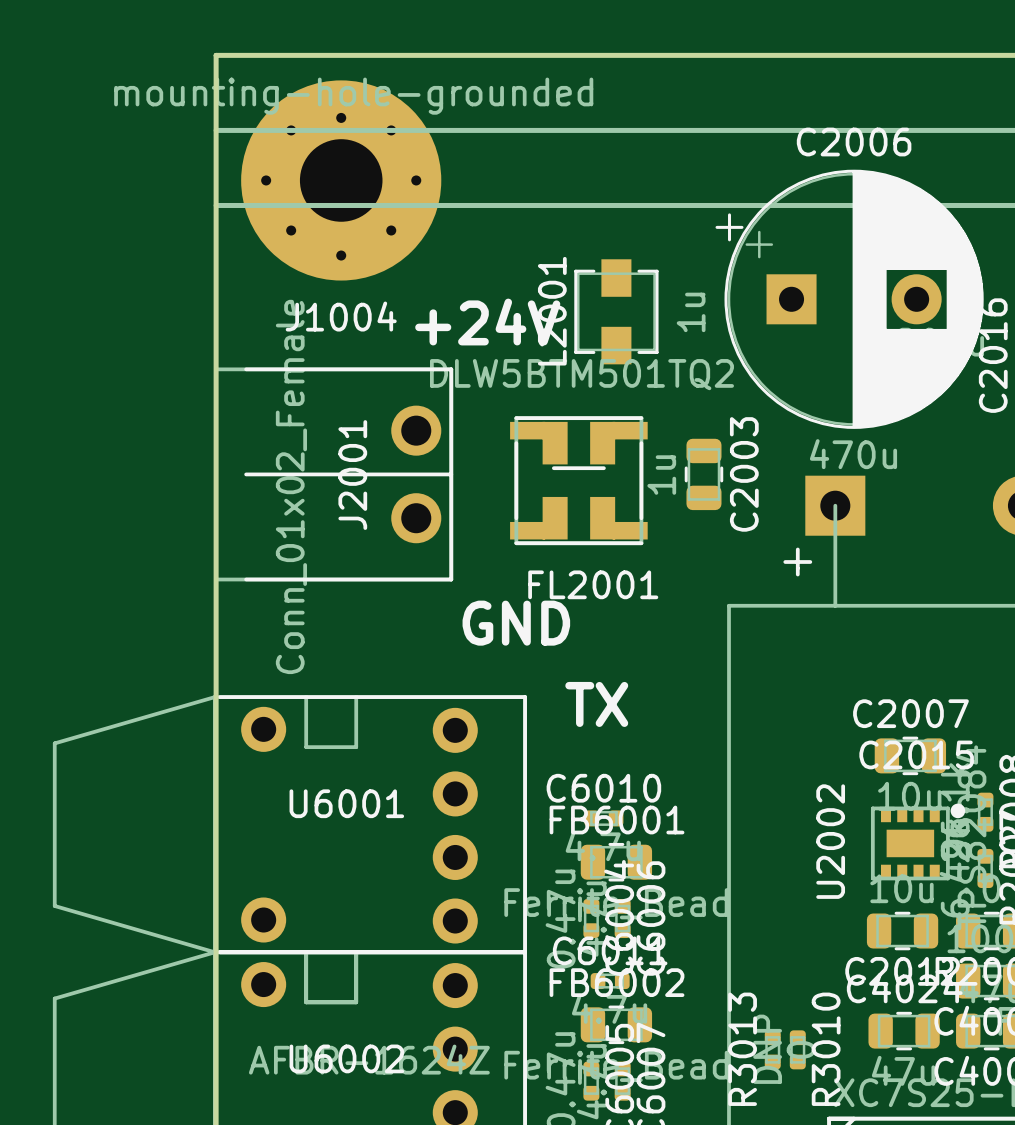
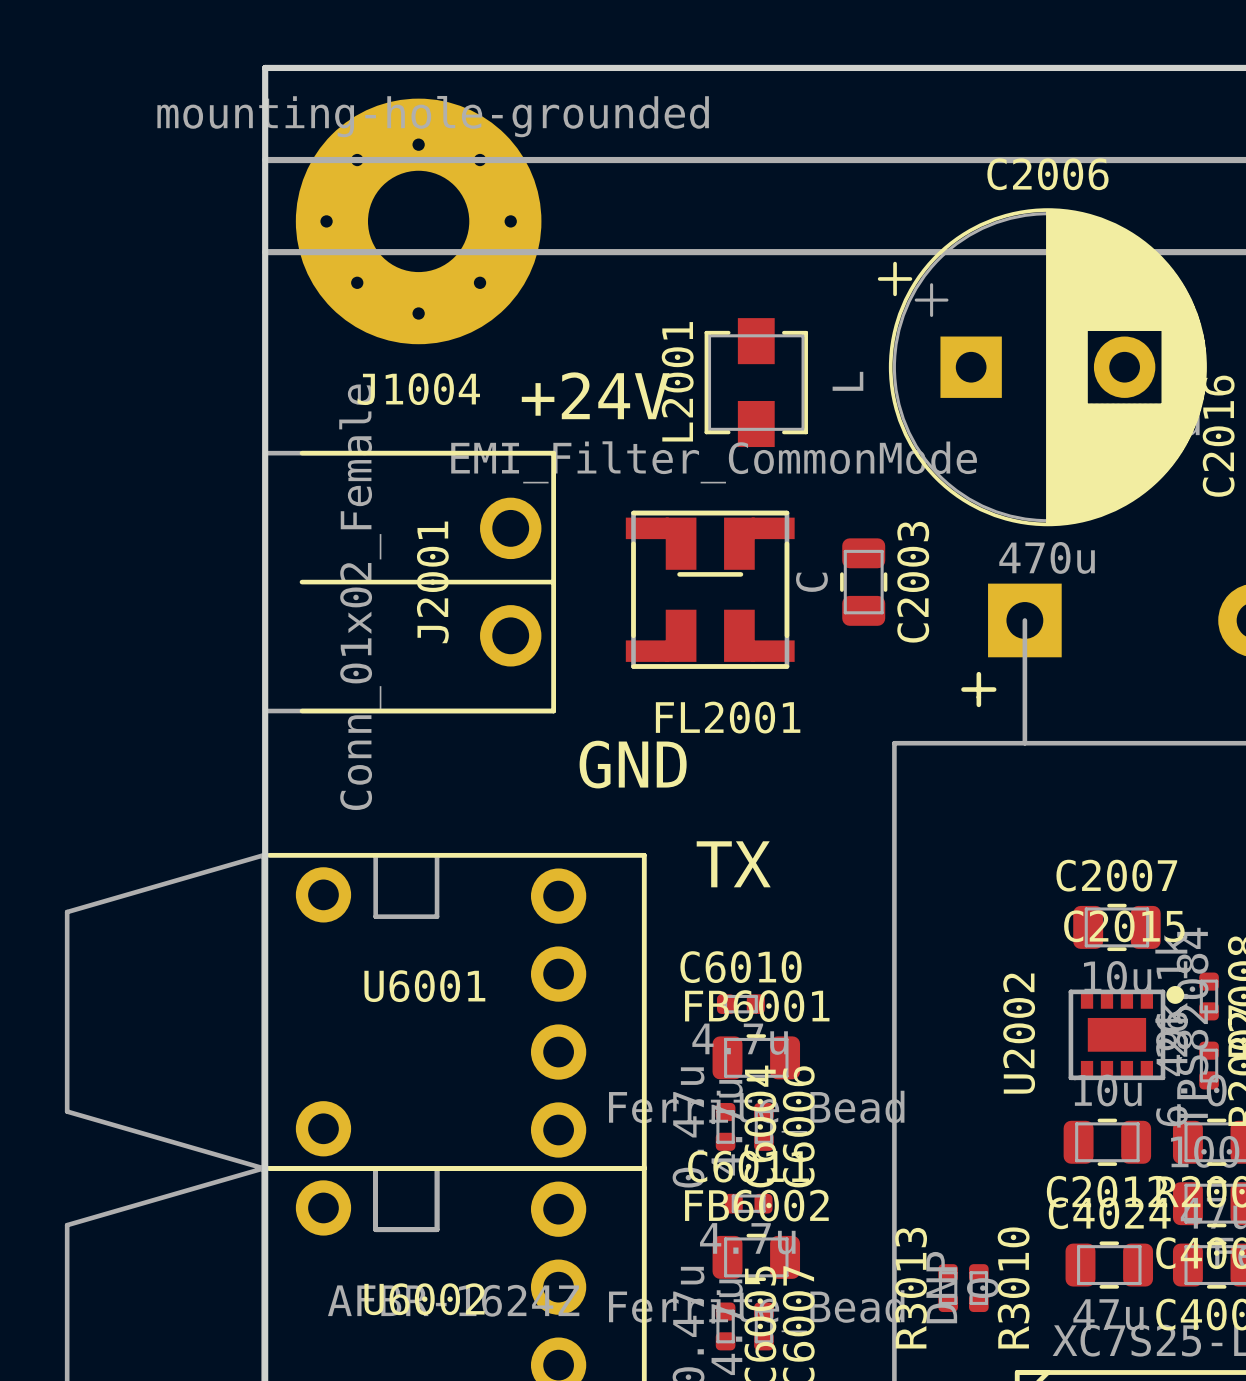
L2001 value: 1u (691, 312) -> L (847, 381)
FL2001 value: DLW5BTM501TQ2 (581, 374) -> EMI_Filter_CommonMode (714, 462)
C2003 value: 1u (661, 475) -> C (811, 582)

